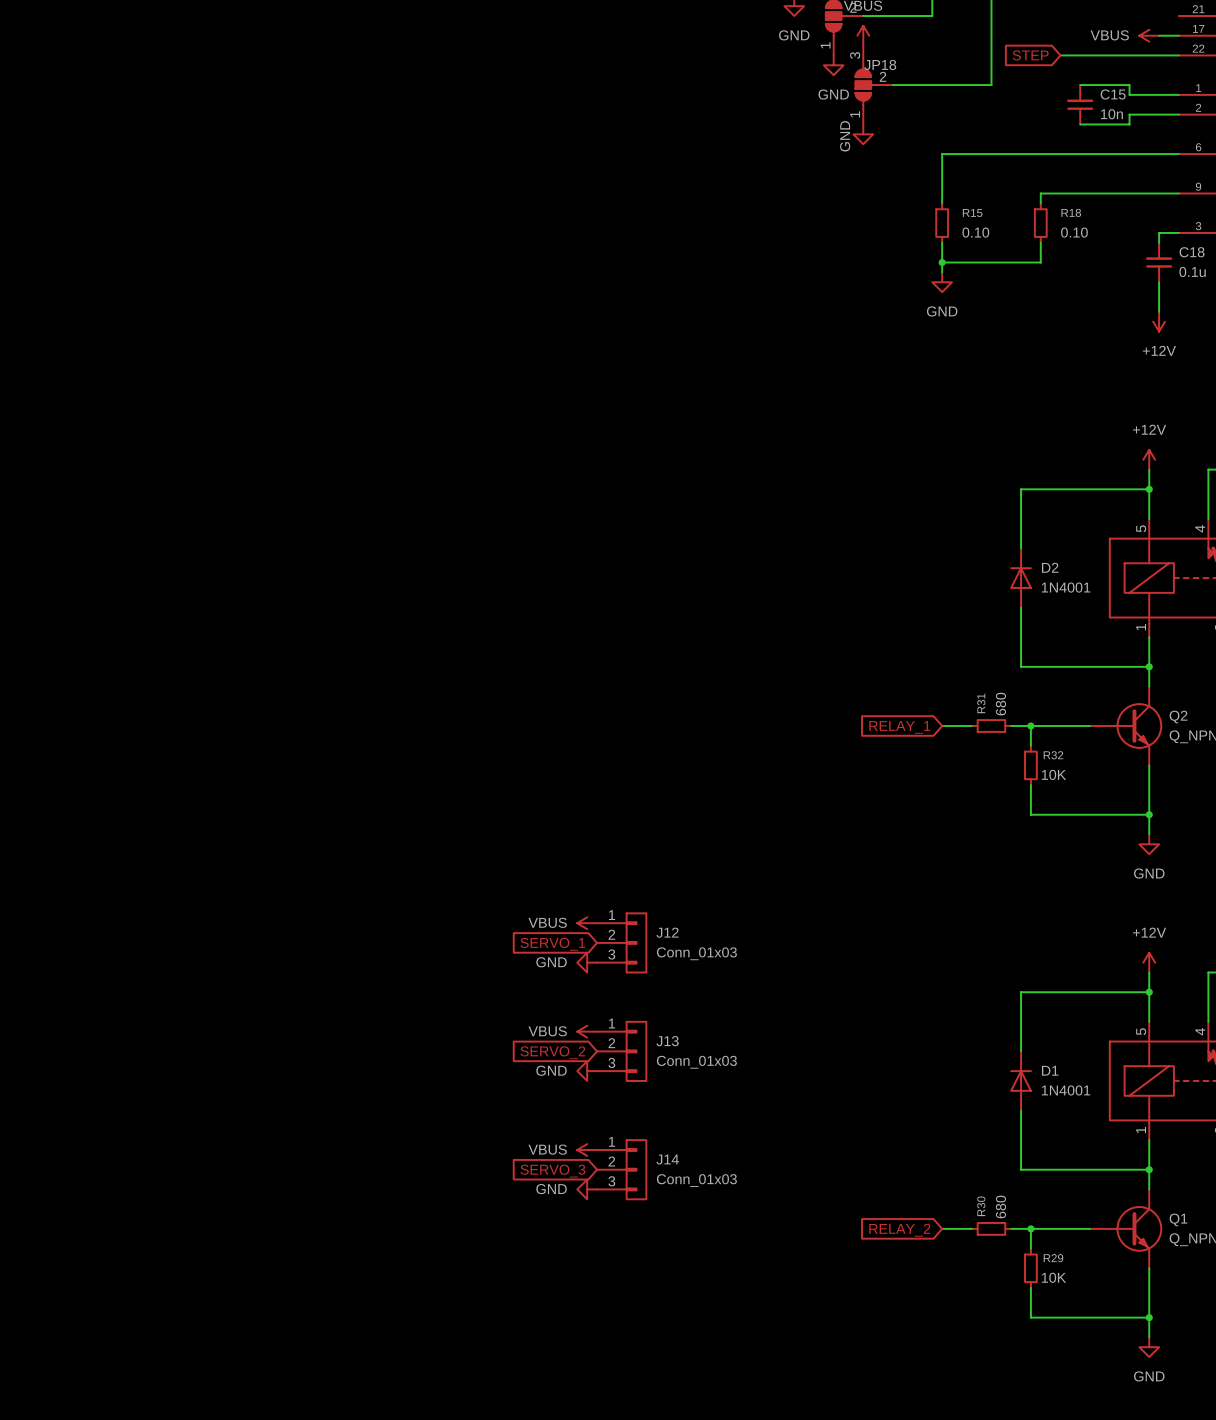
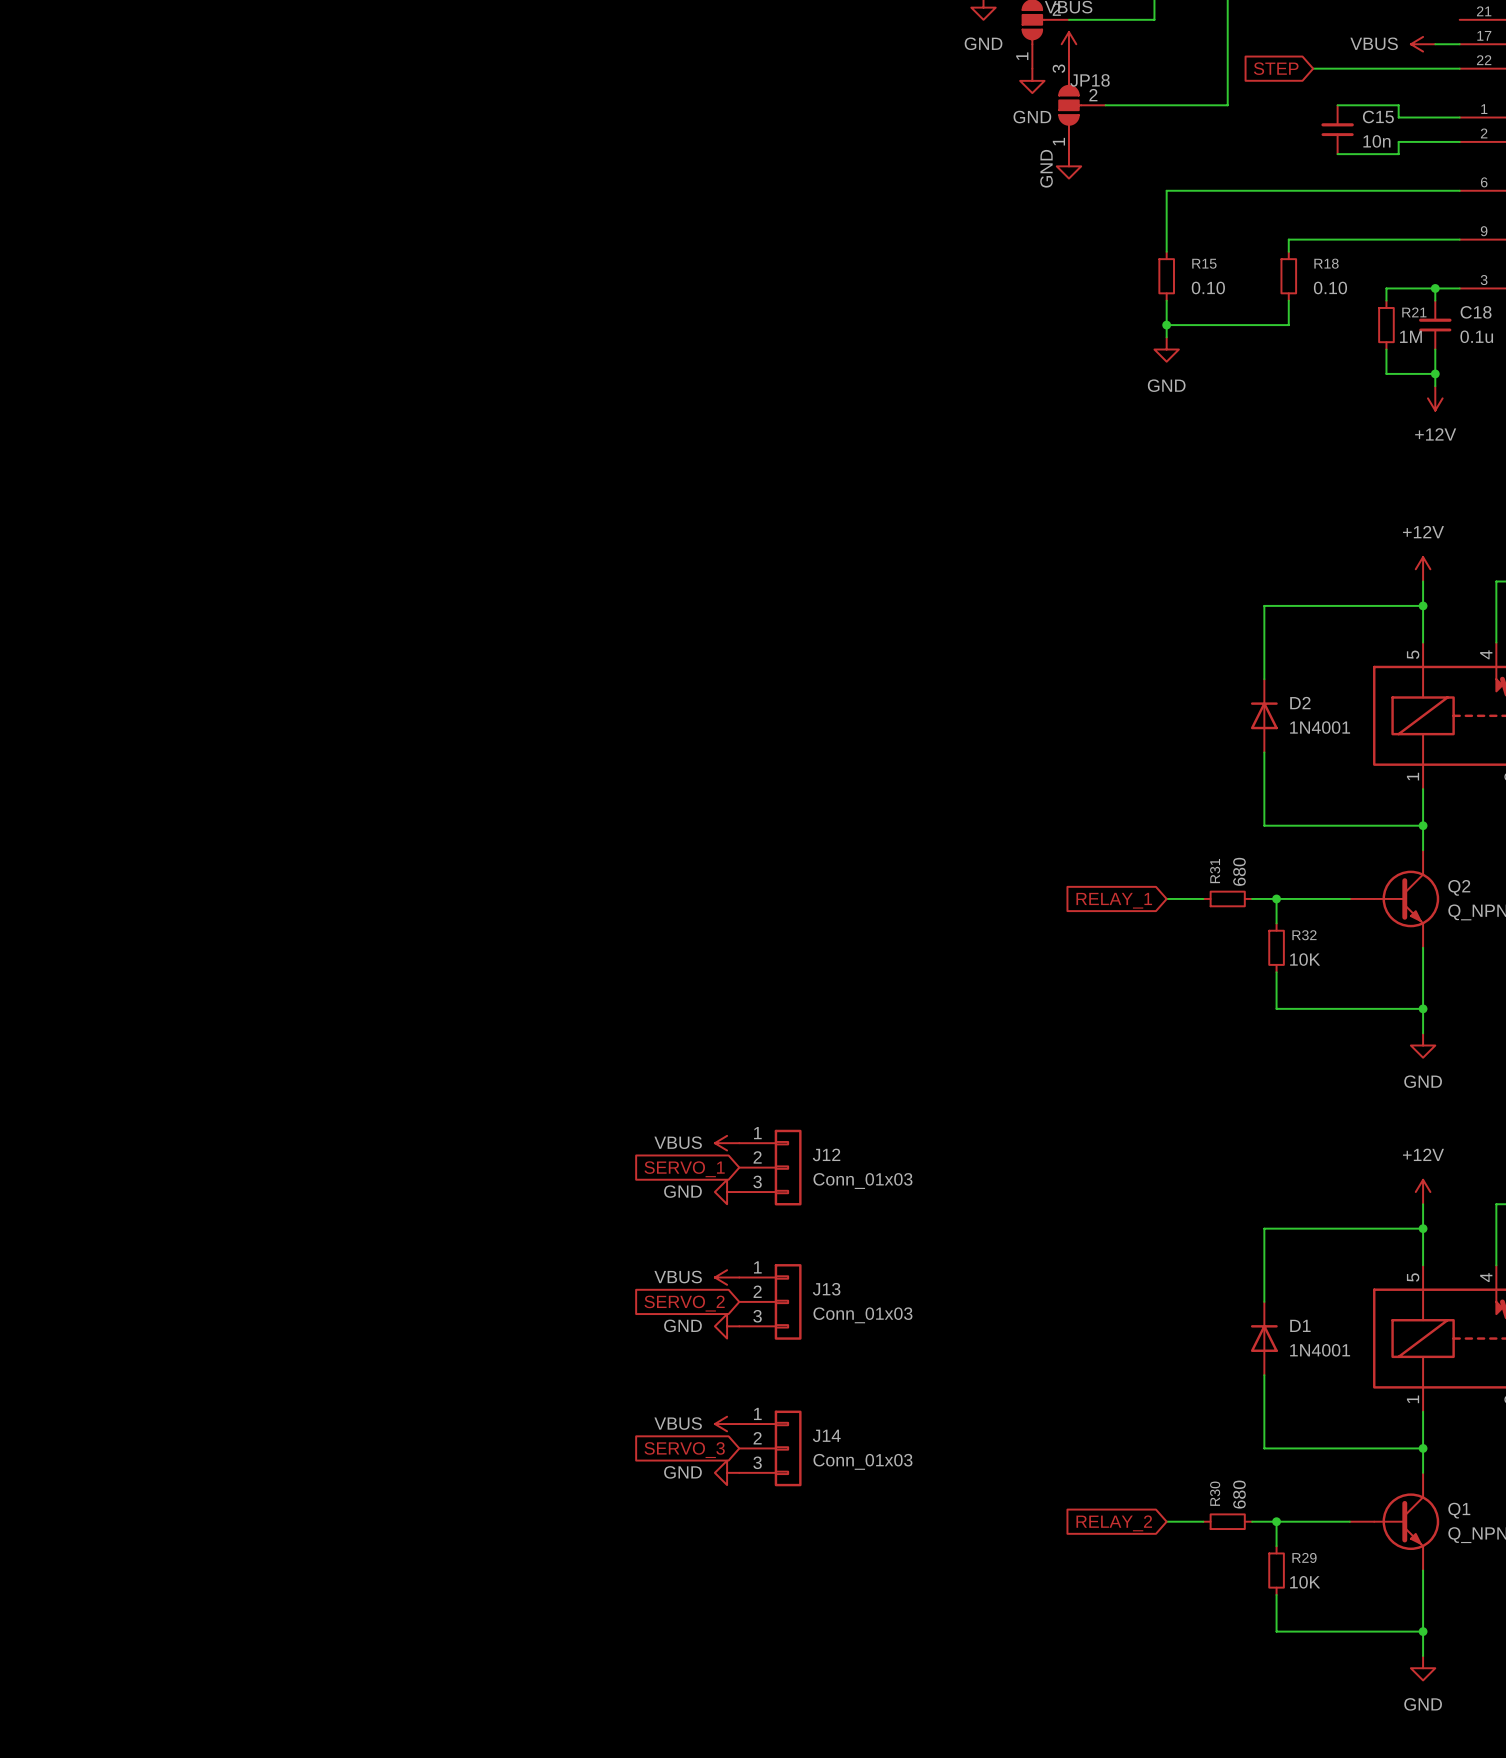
wire: none -> (1435, 288) (1386, 288) (1386, 300)
junction: none -> (1435, 288)
R21: none -> 1M (1386, 325)
wire: none -> (1386, 349) (1386, 373) (1435, 373)
junction: none -> (1435, 373)

